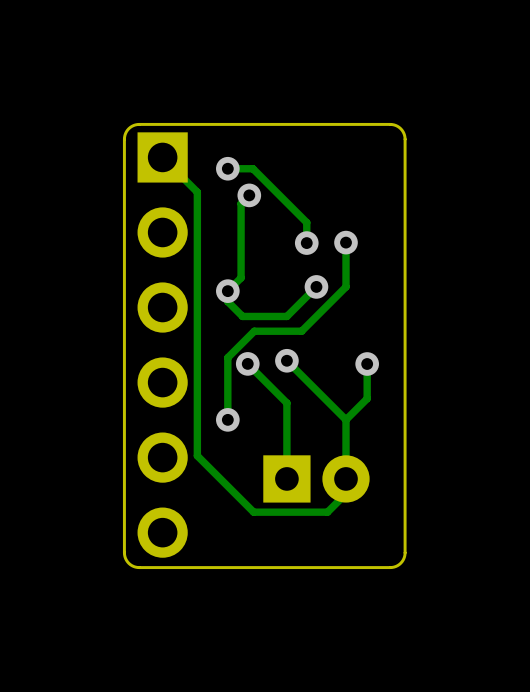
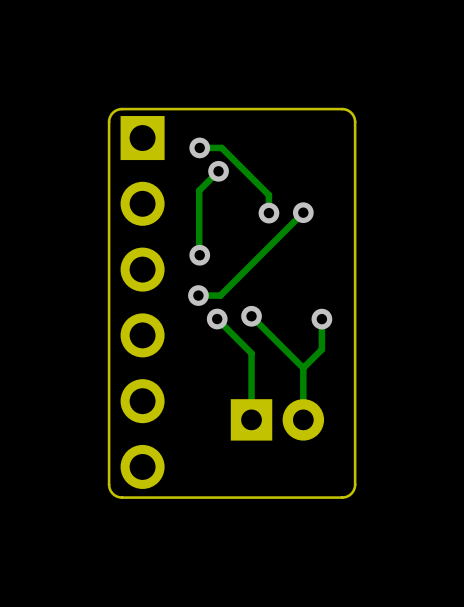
track: (162, 157) (197, 192) (197, 455) (253, 512) (327, 512) (346, 493) (346, 478) -> none
track: (241, 203) (241, 277) (227, 291) (227, 301) (242, 316) (286, 316) (316, 286) -> (211, 178) (199, 190) (199, 259)
track: (346, 242) (346, 286) (301, 331) (254, 331) (227, 357) (227, 419) -> (303, 212) (220, 295) (198, 295)
via: (316, 286) -> none
via: none -> (198, 295)
via: (227, 419) -> none

